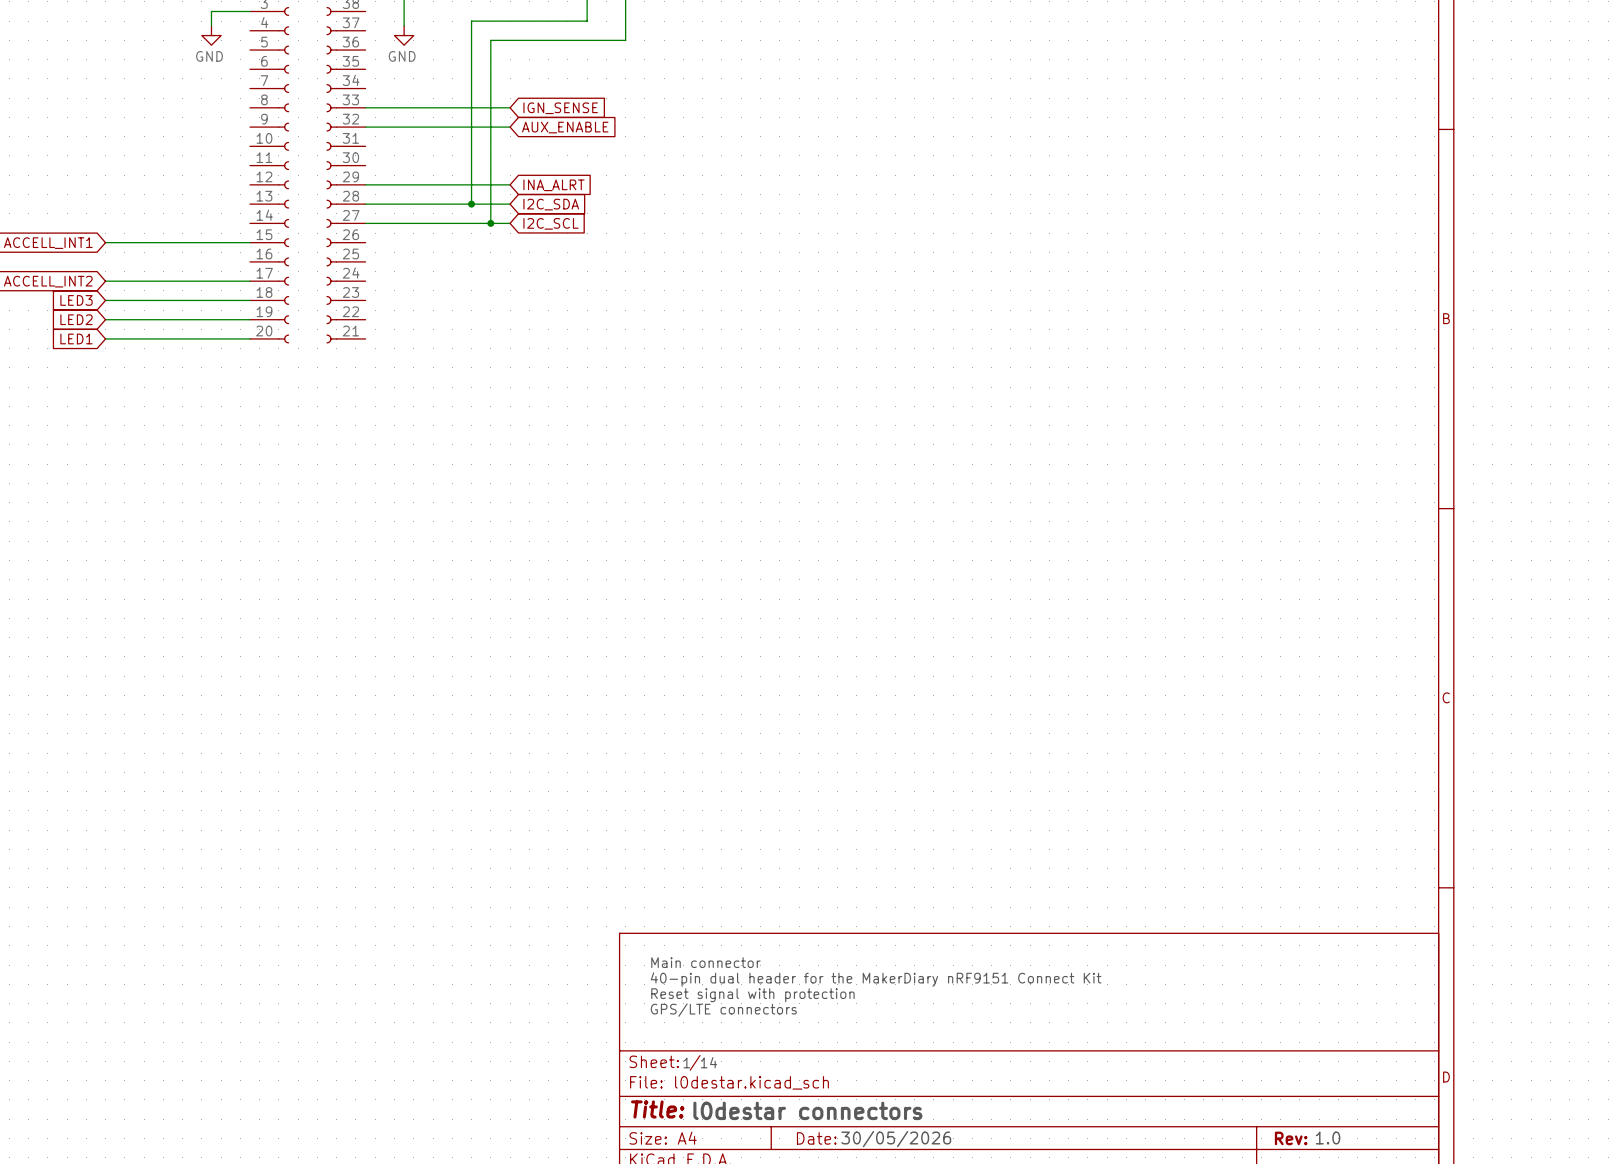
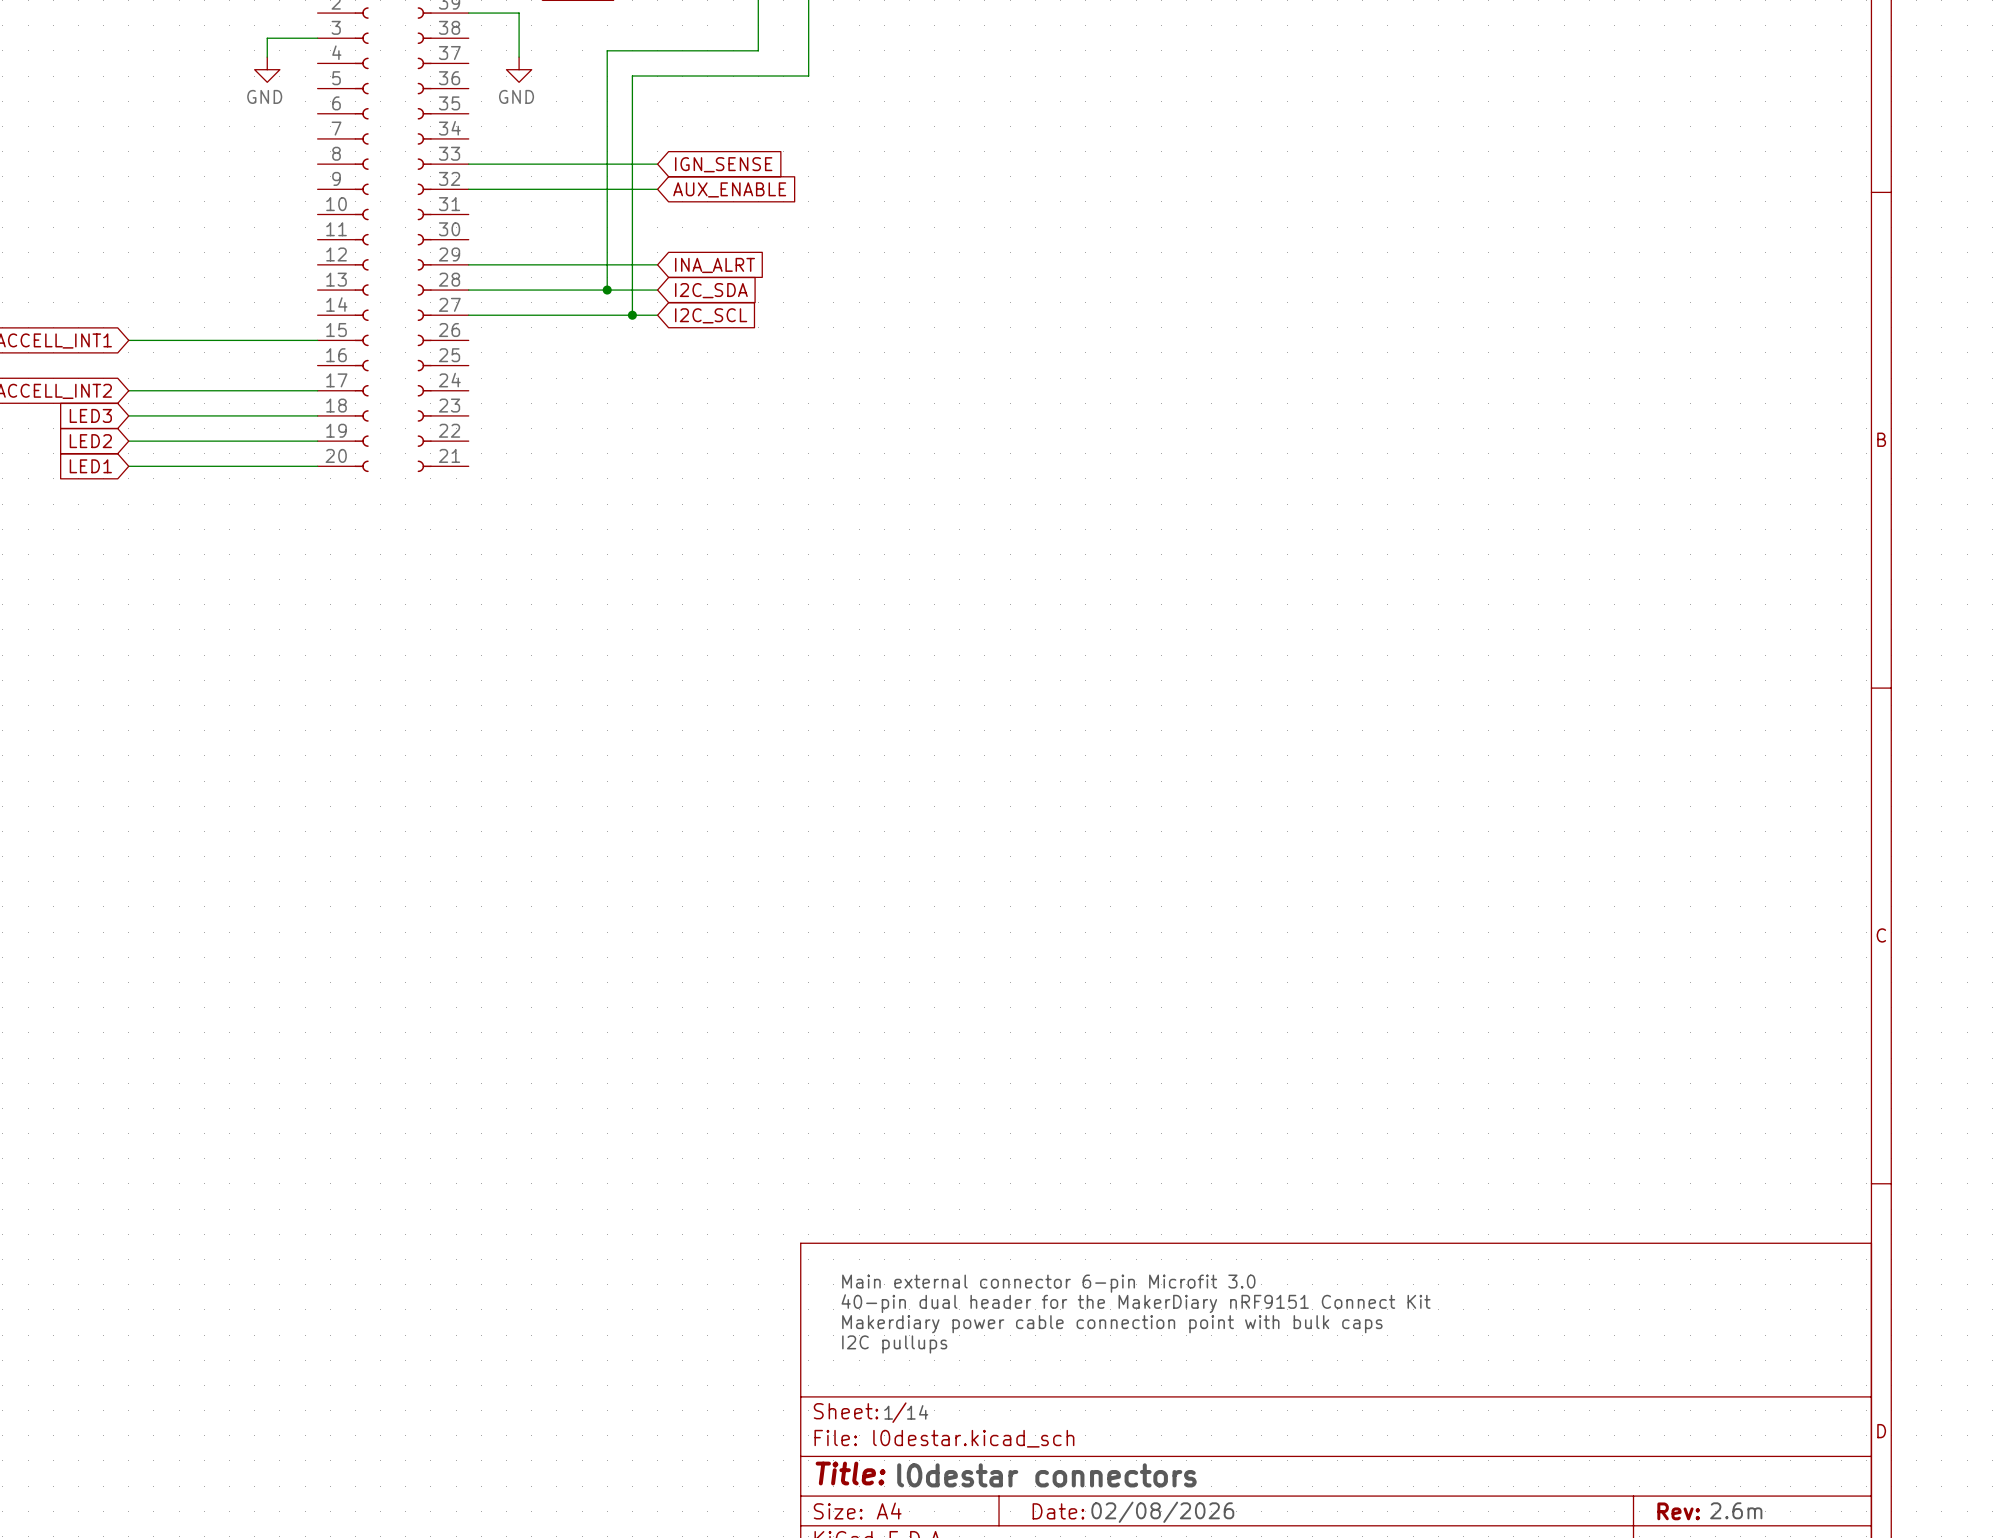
text: Main connector (705, 962) -> Main external connector 6-pin Microfit 3.0 (1048, 1283)
text: Reset signal with protection (752, 995) -> Makerdiary power cable connection point with bulk caps (1112, 1324)
text: GPS/LTE connectors (723, 1010) -> I2C pullups (894, 1344)
text: 1.0 (1328, 1138) -> 2.6m (1736, 1510)
text: 30/05/2026 (896, 1139) -> 02/08/2026 (1162, 1512)

